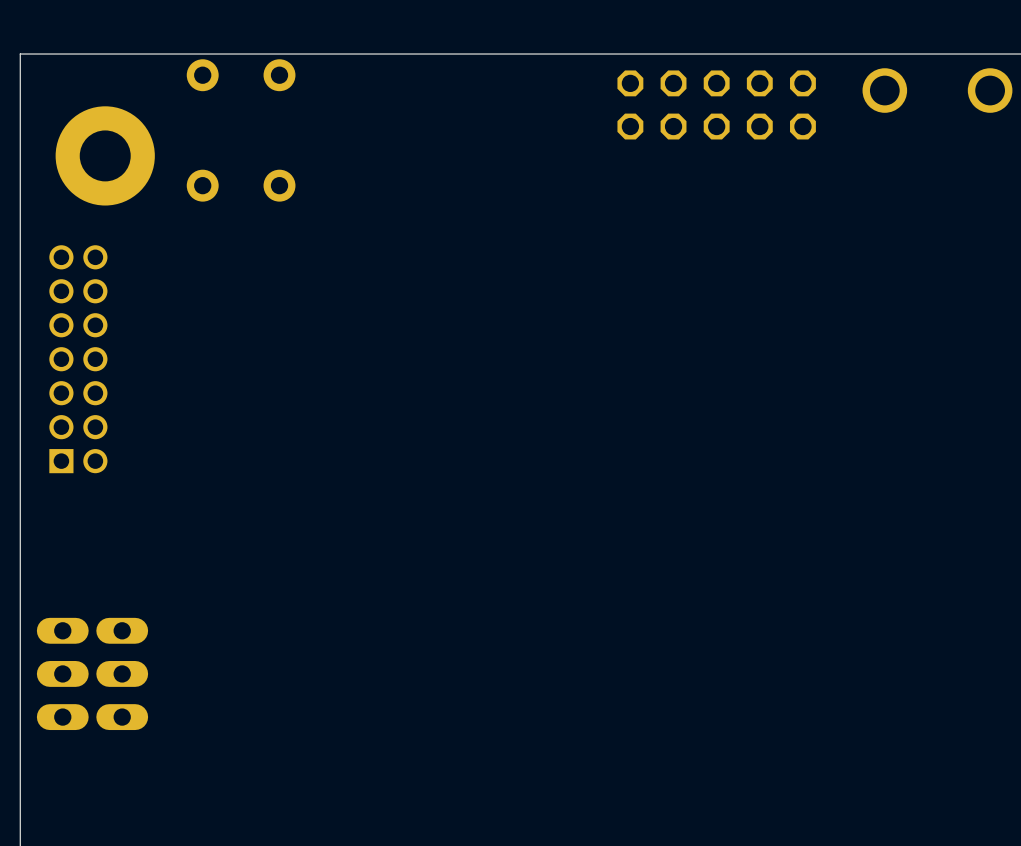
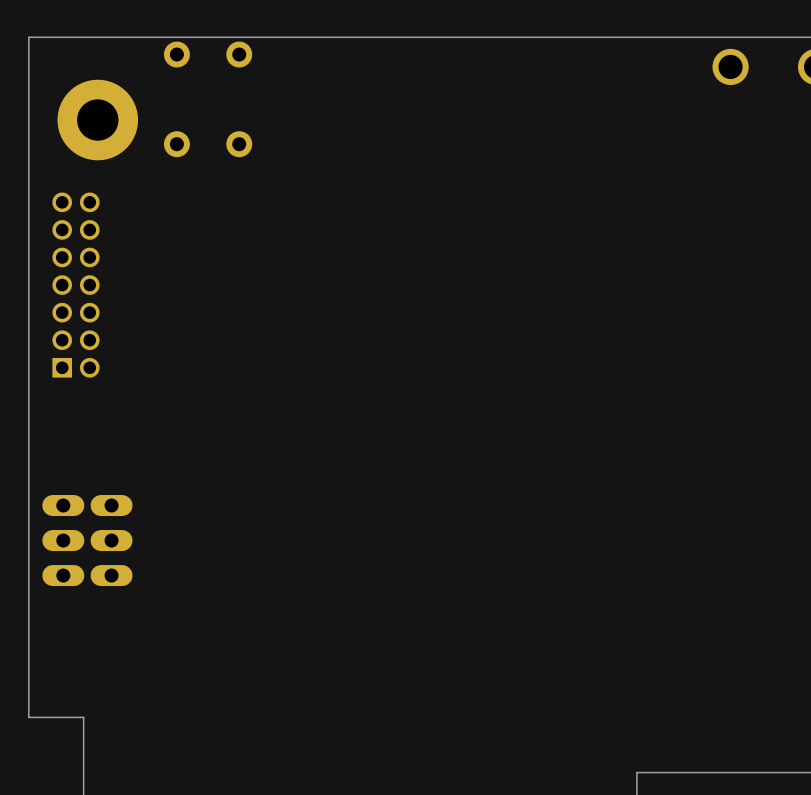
part: (716, 104) -> none

